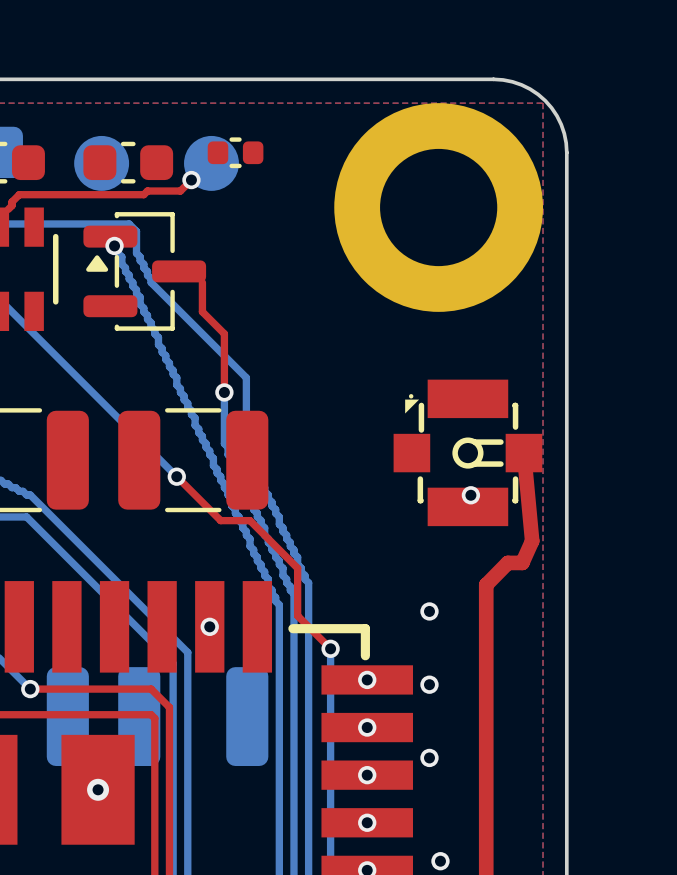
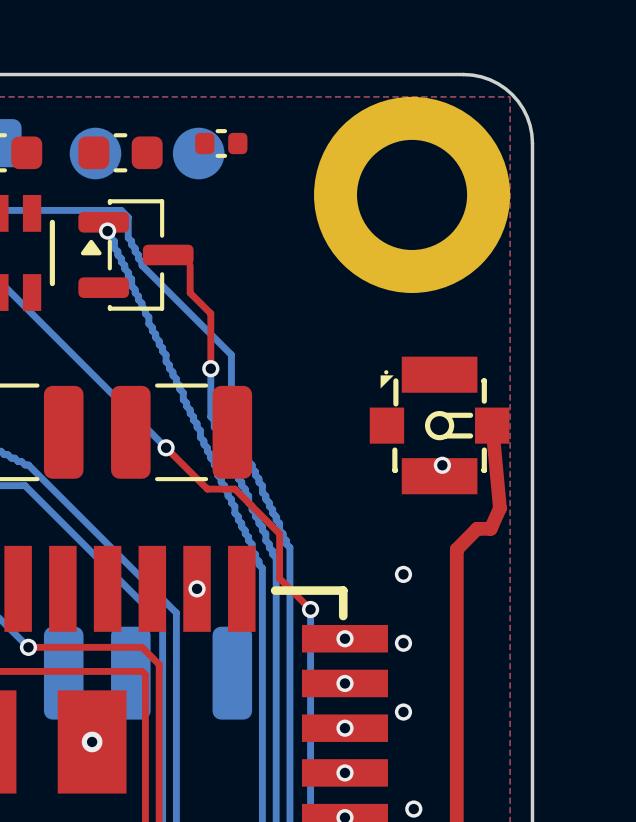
top track: (191, 180) (180, 191) (147, 191) (143, 194) (19, 194) (8, 209) -> none
via: (191, 180) -> none

